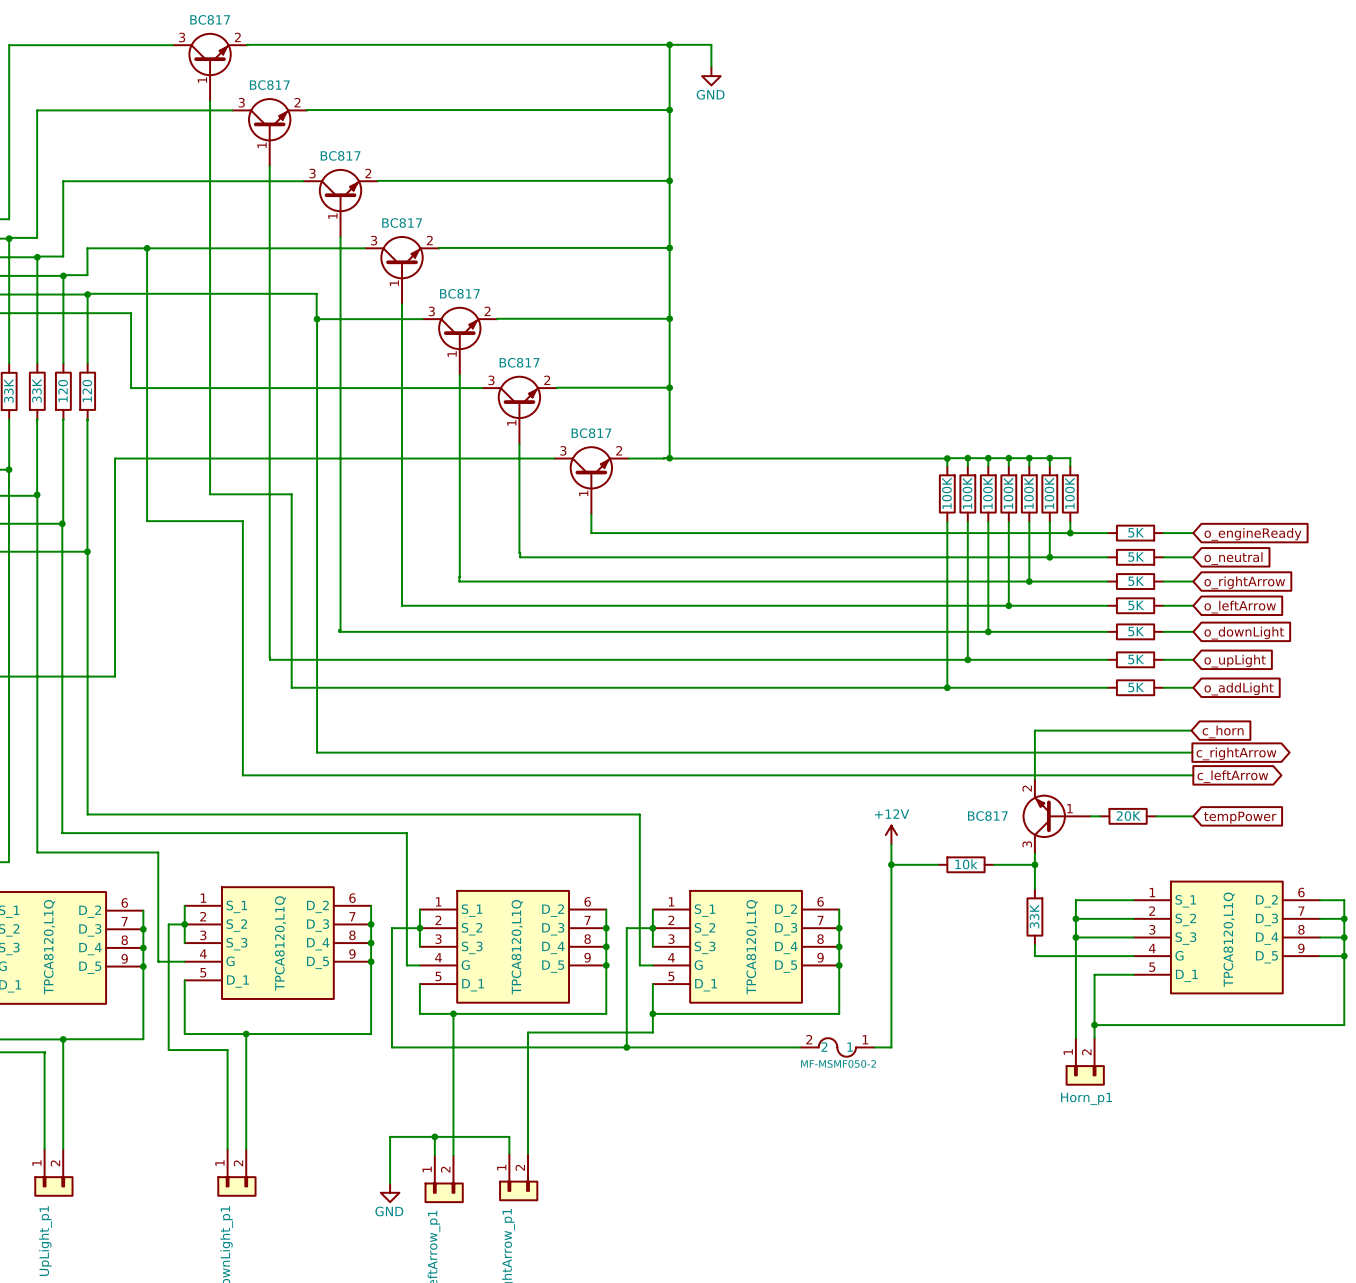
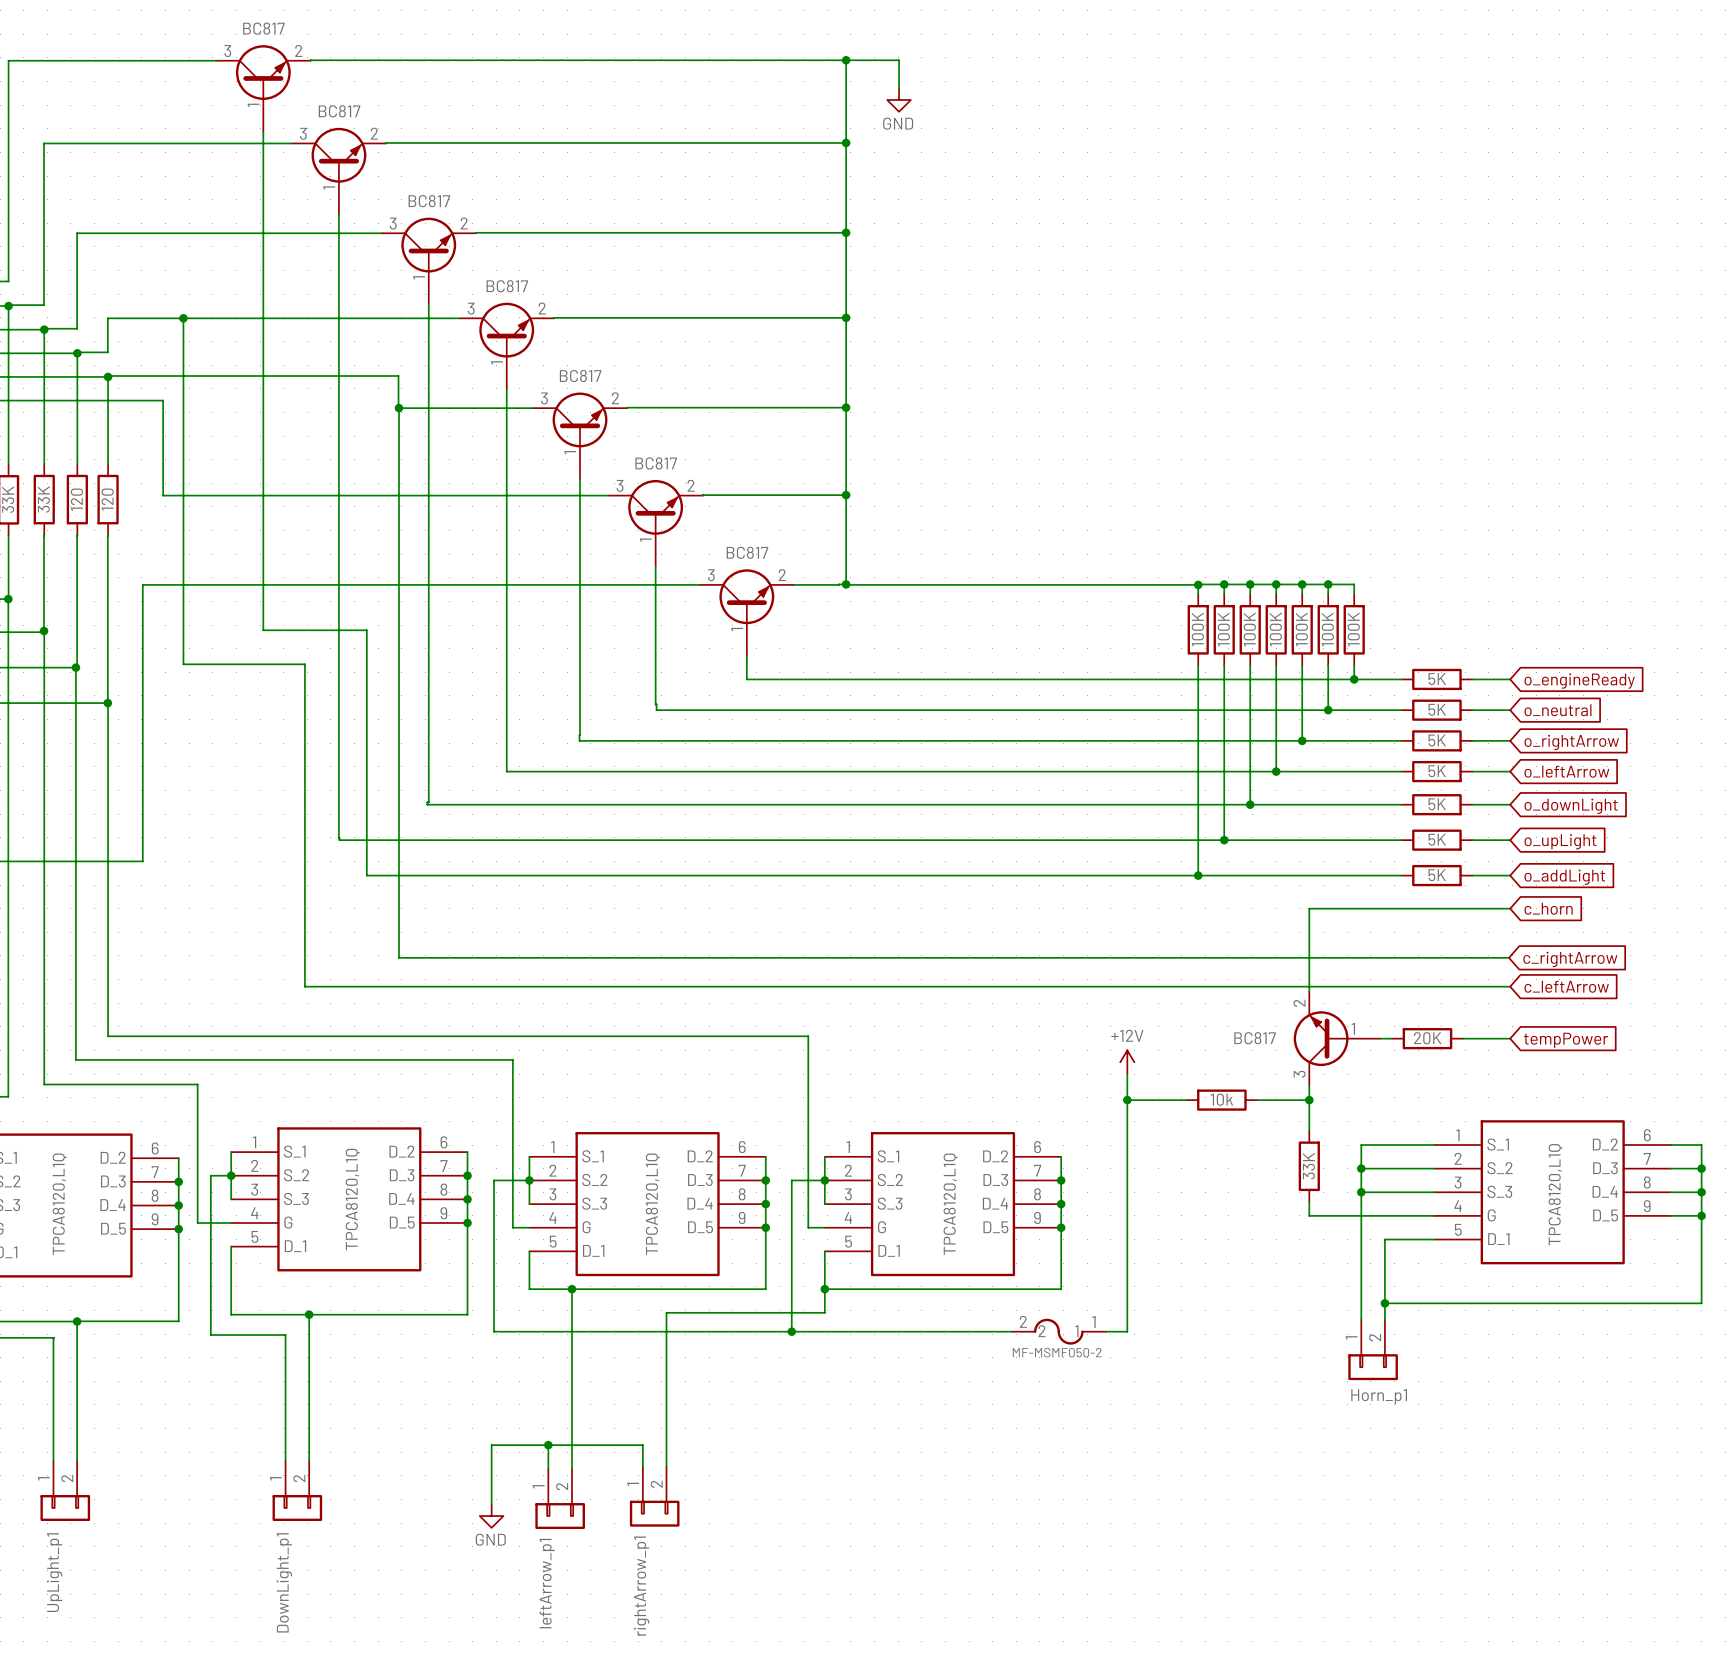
wire: (1034, 730) (1191, 730) -> (1309, 929) (1309, 908) (1510, 908)
global label position: c_horn (1223, 731) -> c_horn (1548, 908)
global label shape: output (1236, 753) -> input (1570, 959)
global label shape: output (1232, 776) -> input (1566, 986)

